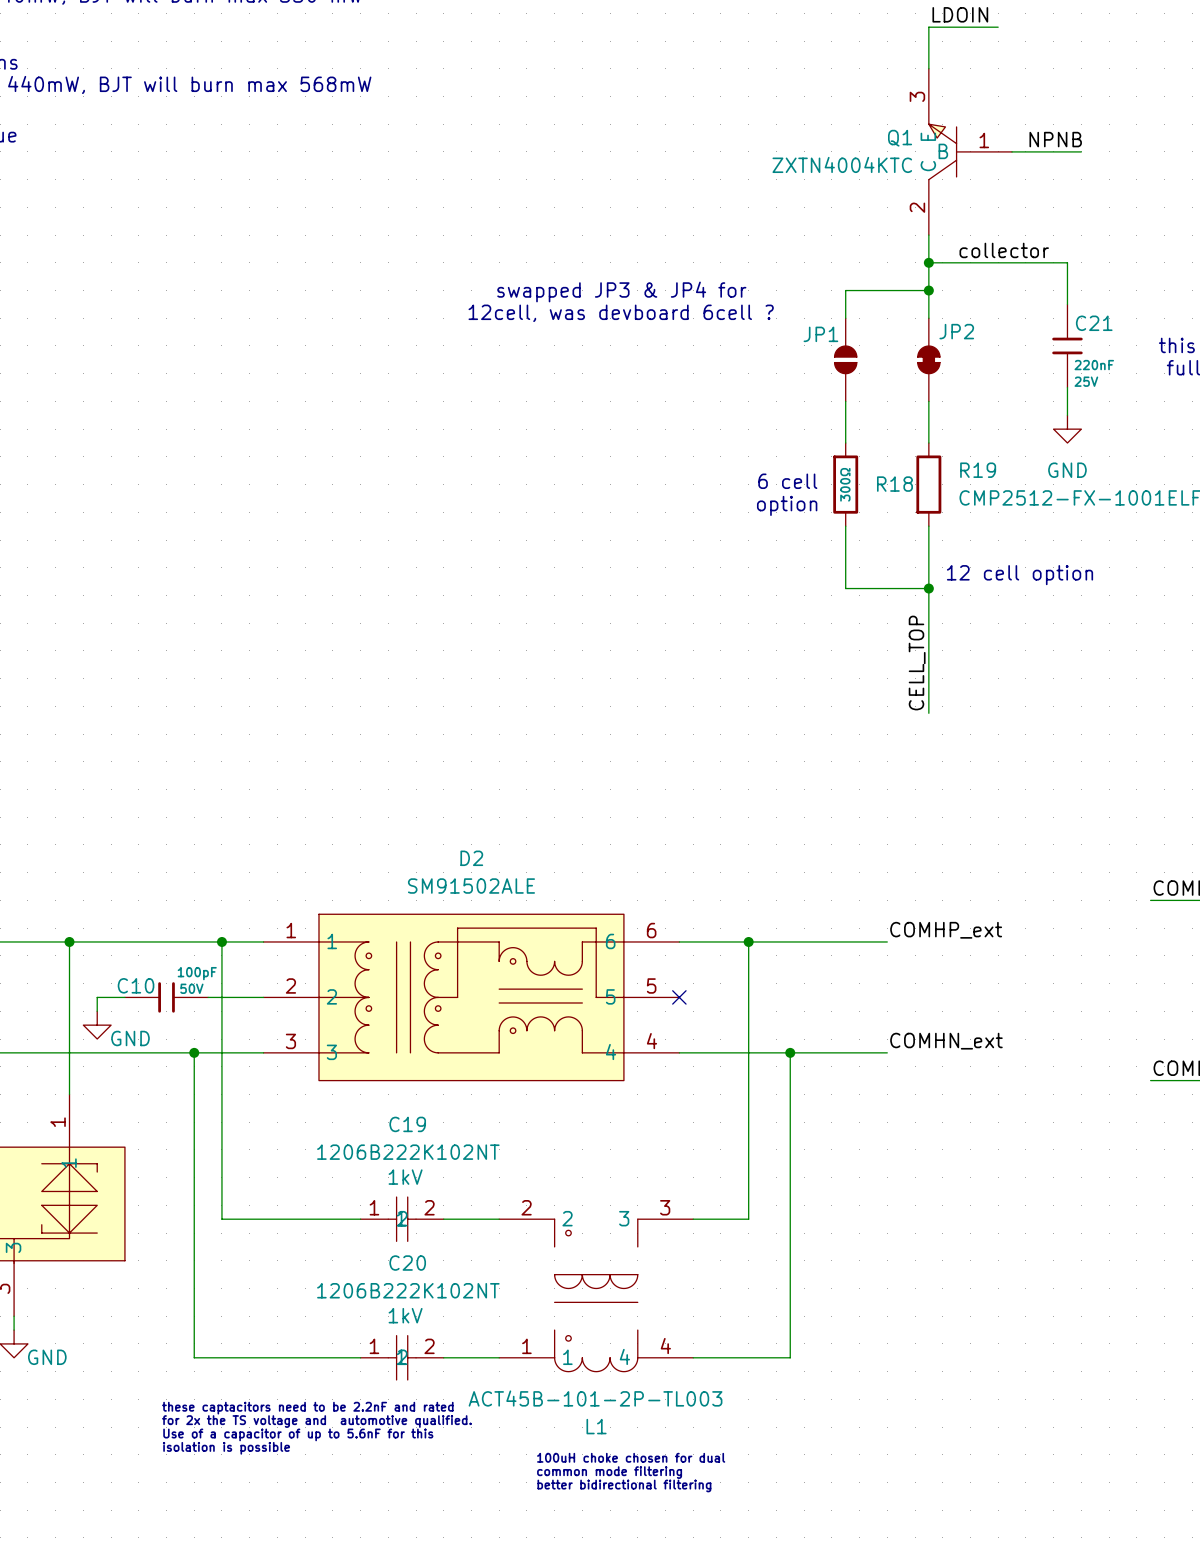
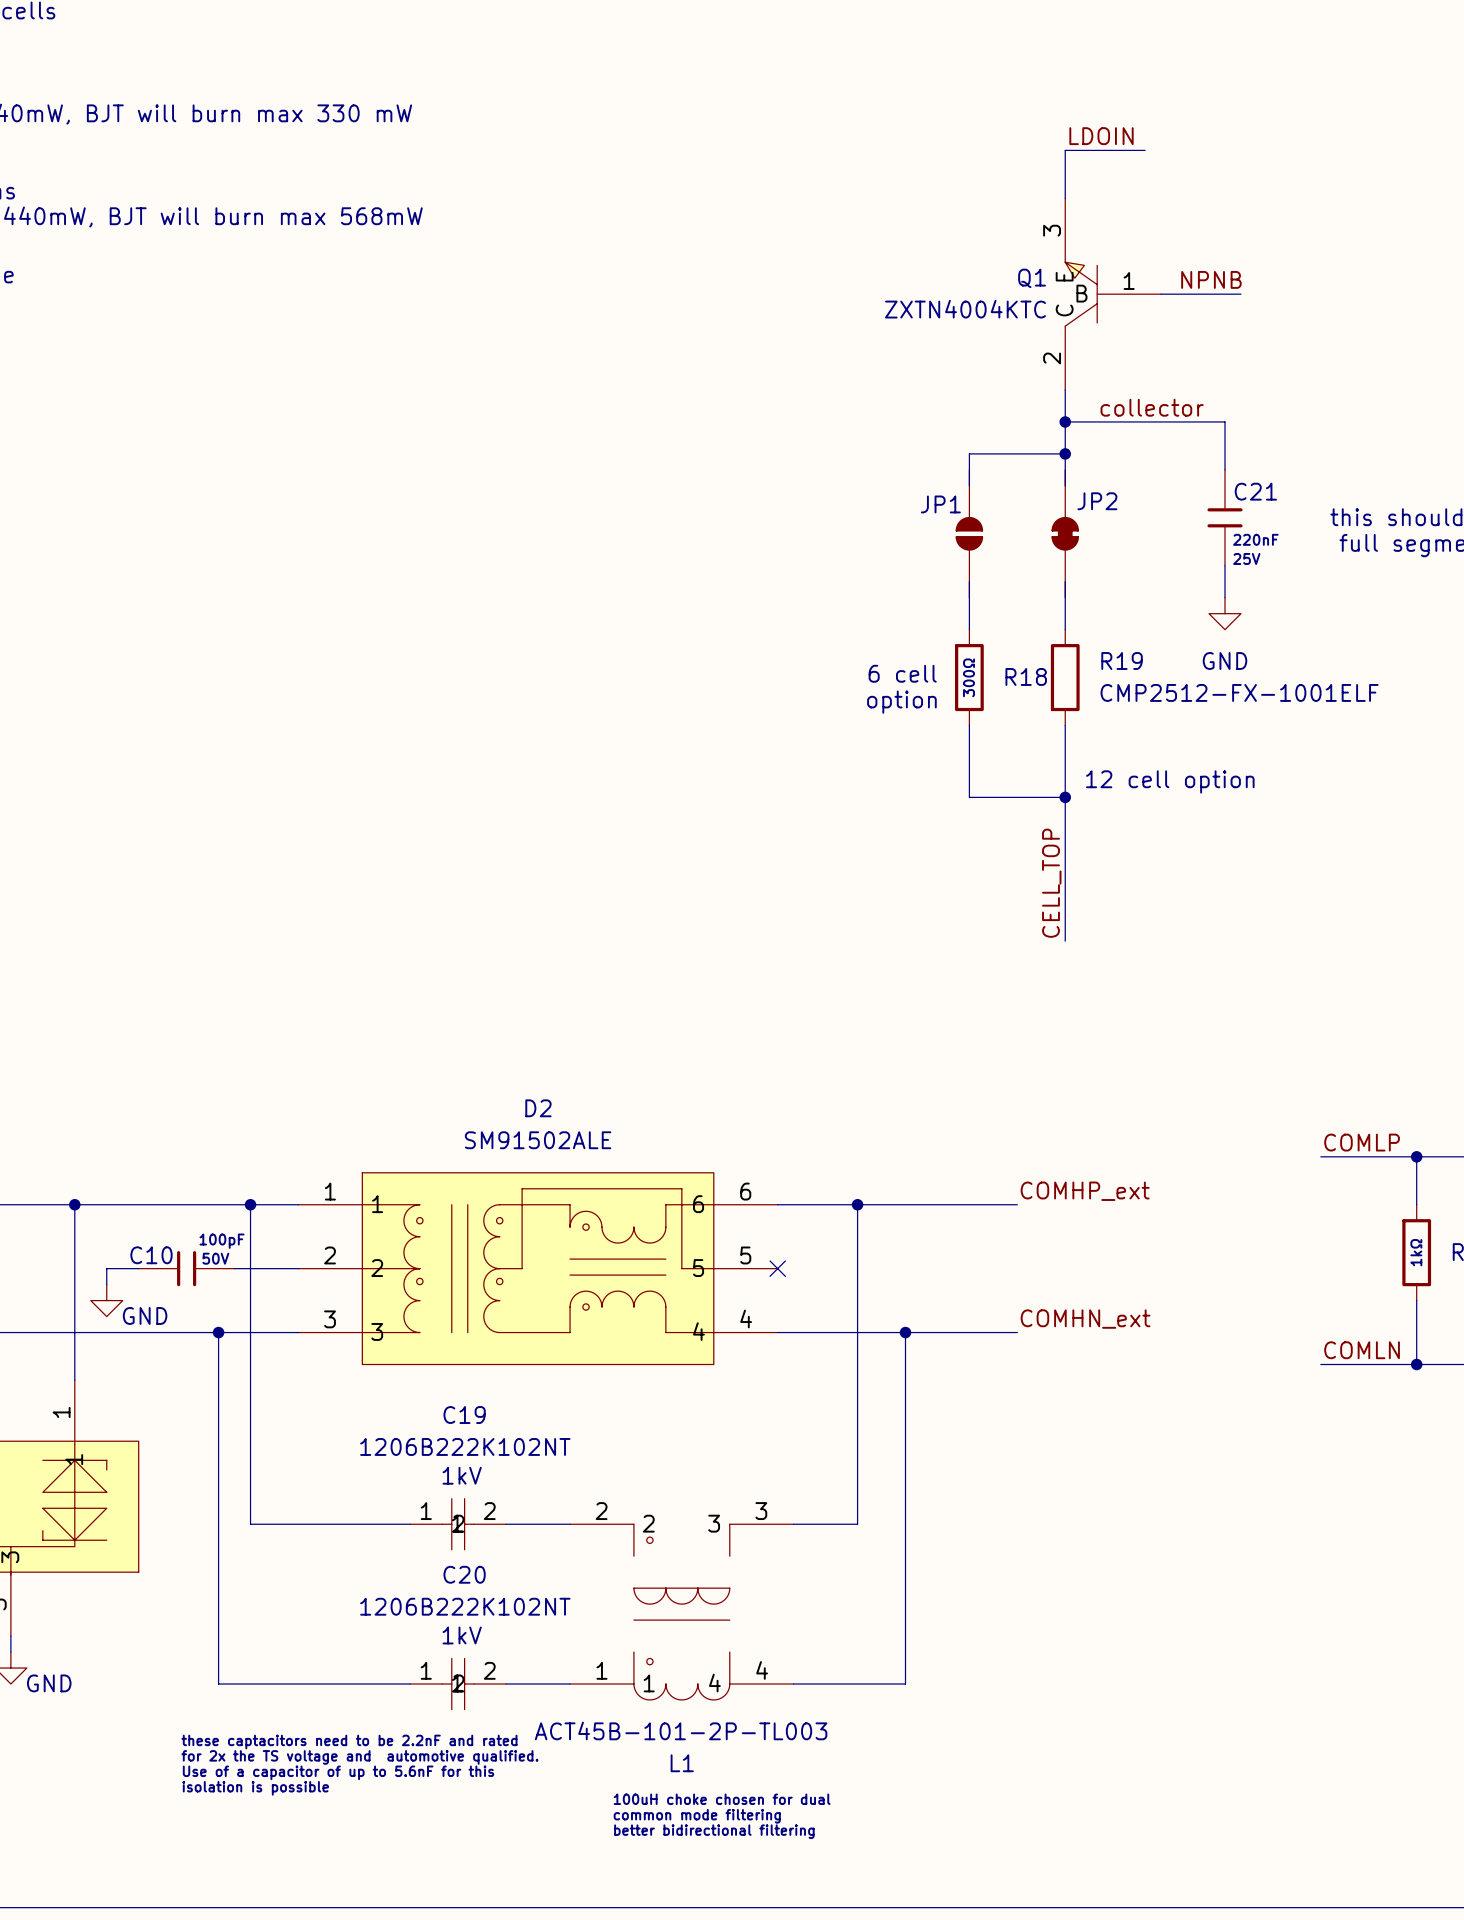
text: swapped JP3 & JP4 for (621, 291) -> none
text: 12cell, was devboard 6cell ? (621, 313) -> none
JP1 symbol: [834, 318, 857, 402] -> [955, 469, 984, 598]
JP2 symbol: [917, 318, 940, 402] -> [1051, 469, 1079, 598]

